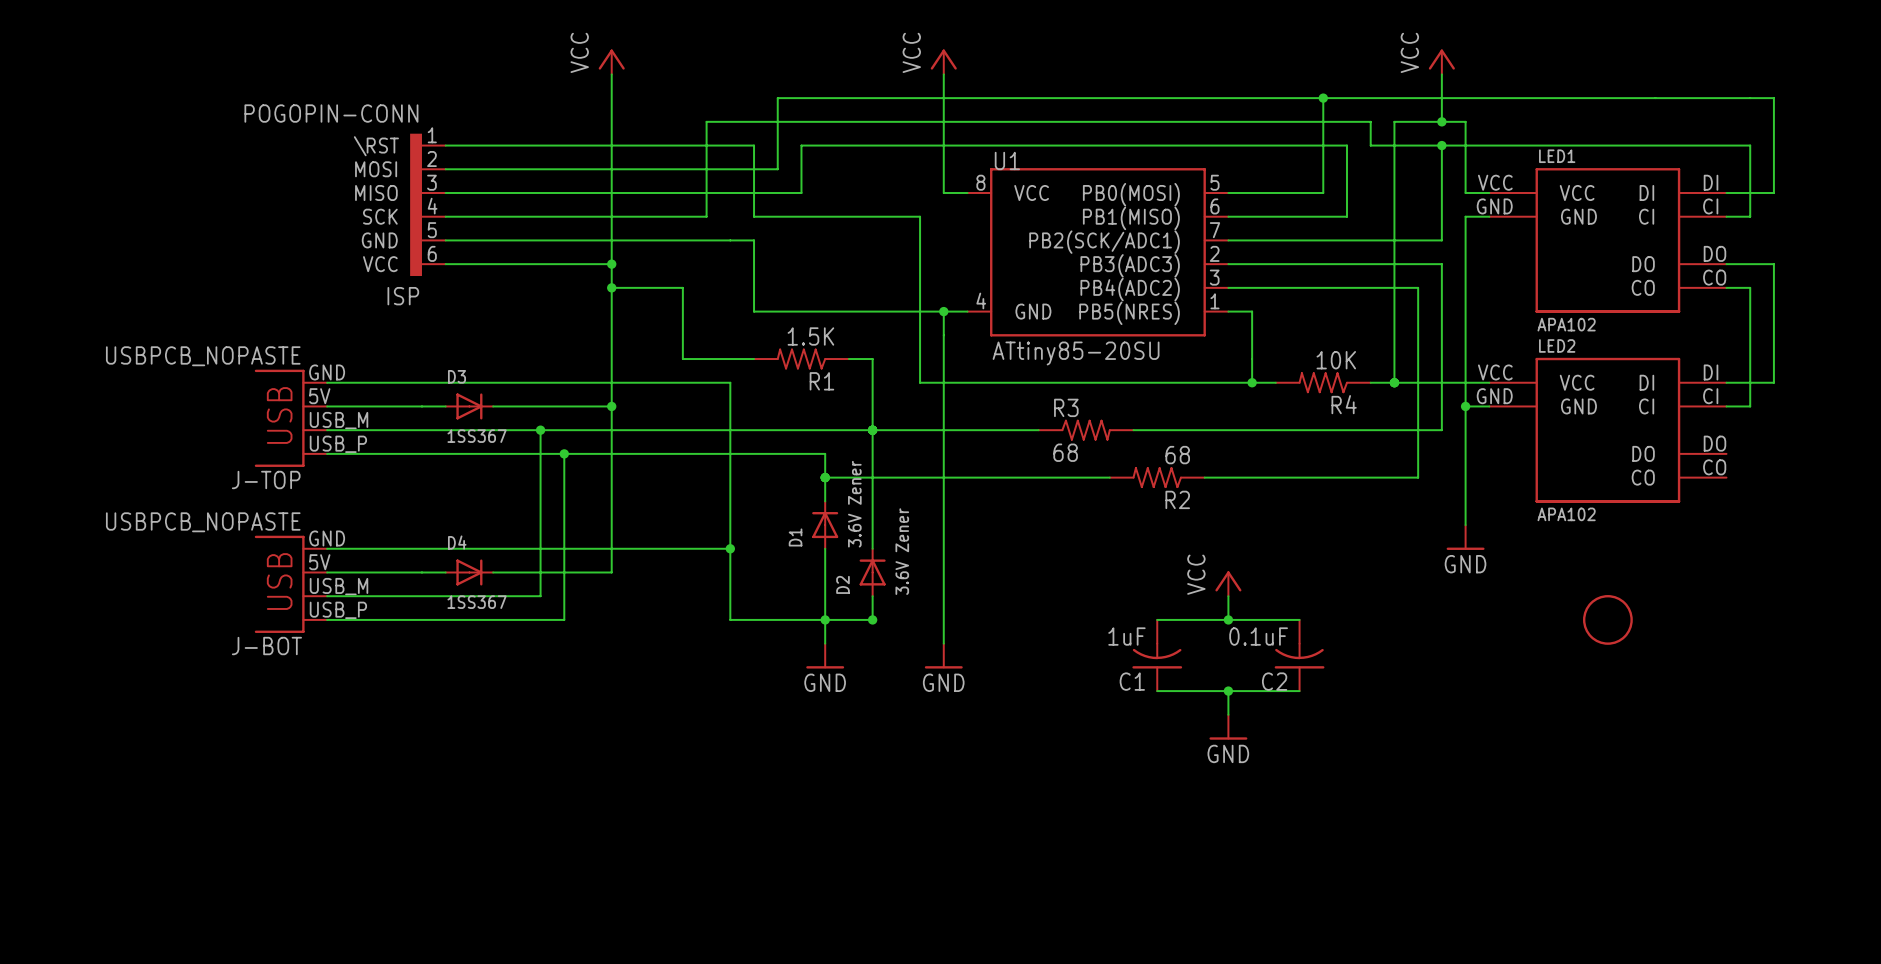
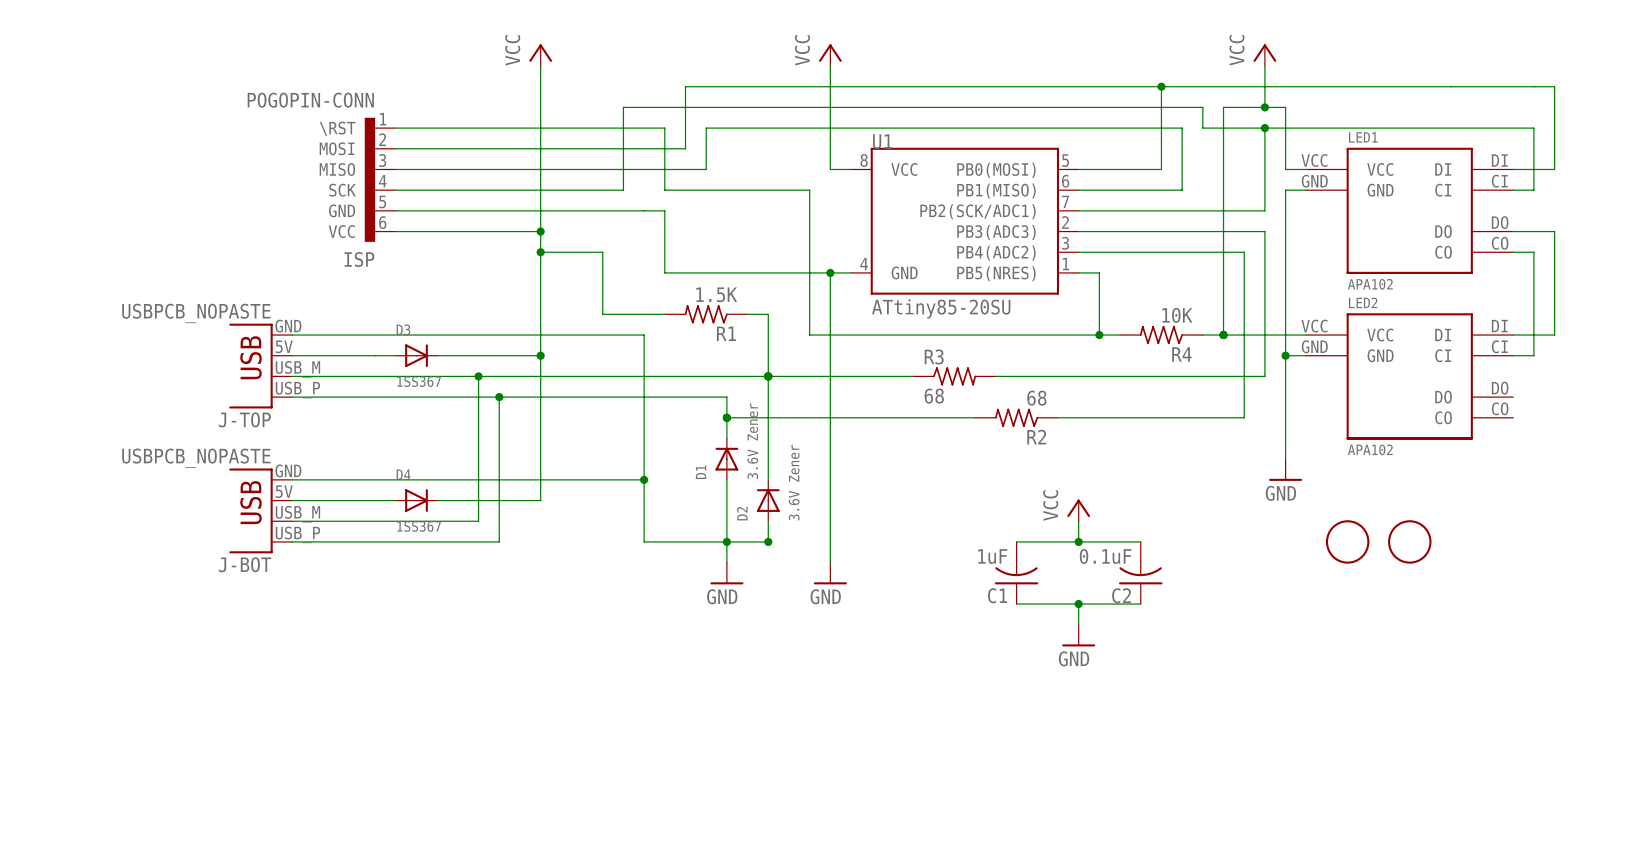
part: none -> (1347, 541)

